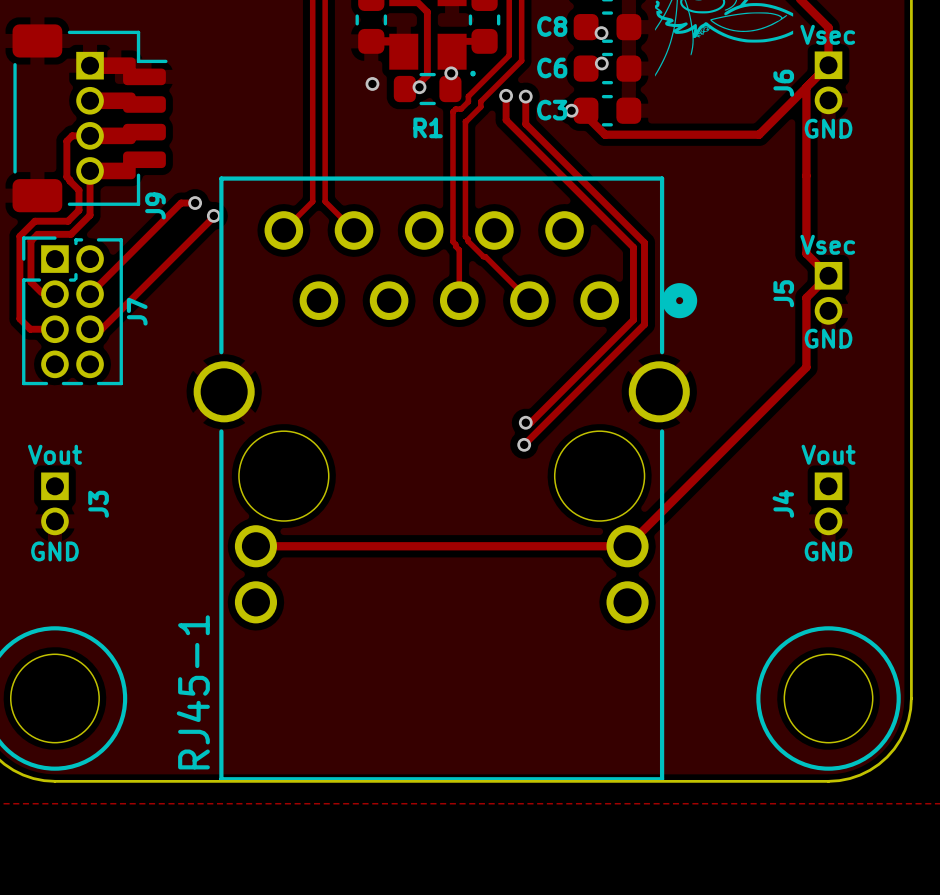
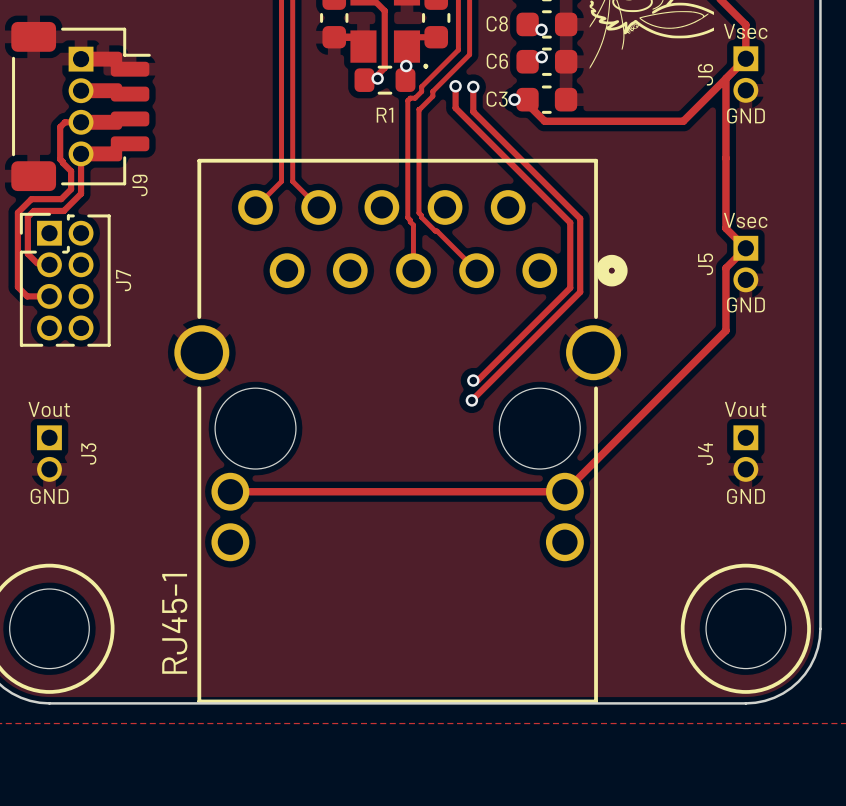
via: (372, 83) -> none
track: (195, 203) (181, 203) (90, 294) -> none
via: (195, 203) -> none
track: (213, 215) (101, 329) (90, 329) -> none
via: (213, 215) -> none

